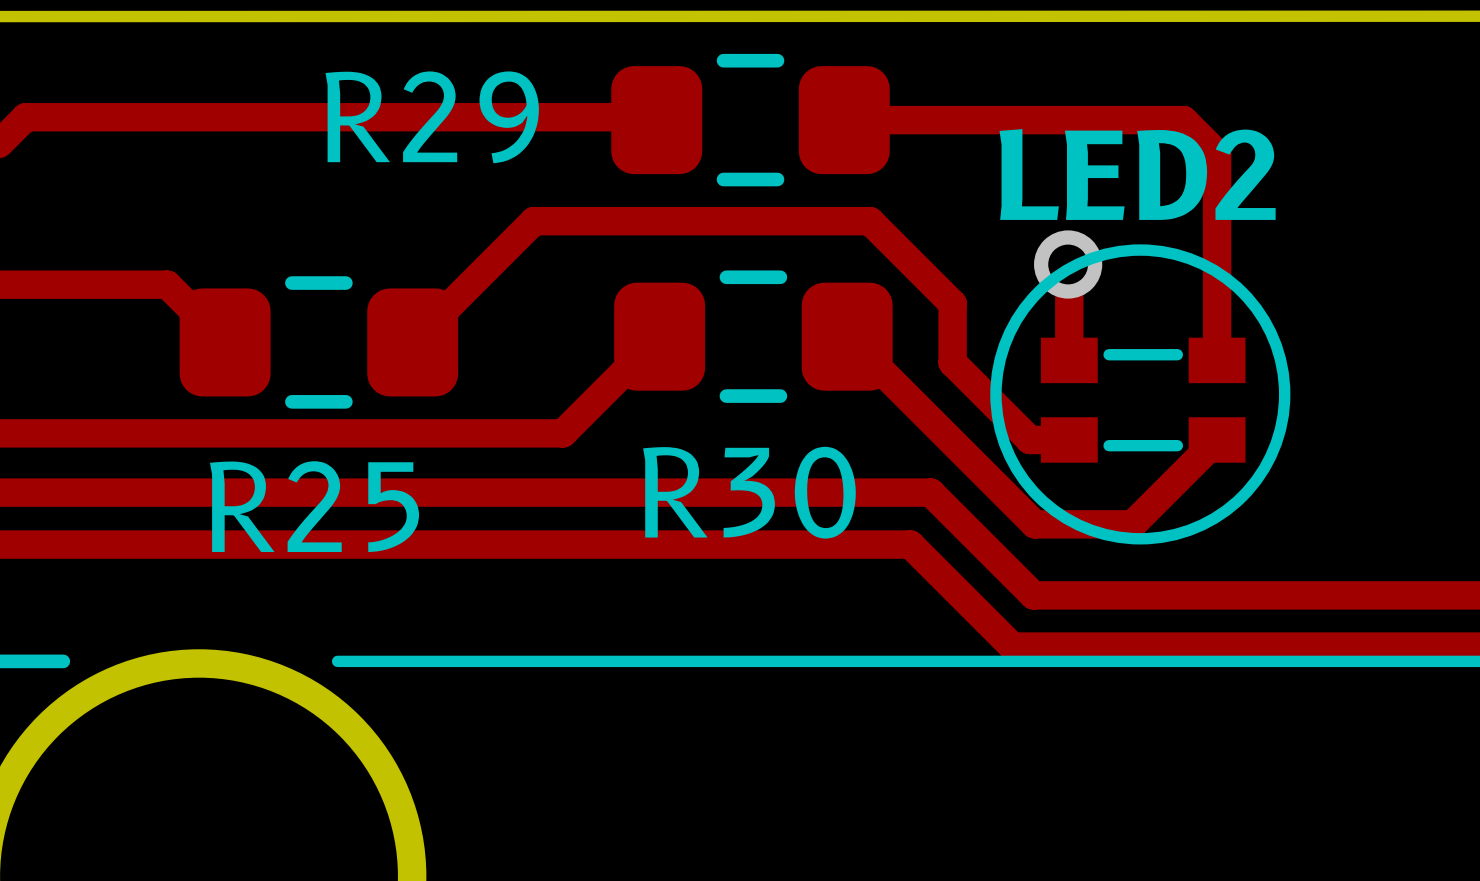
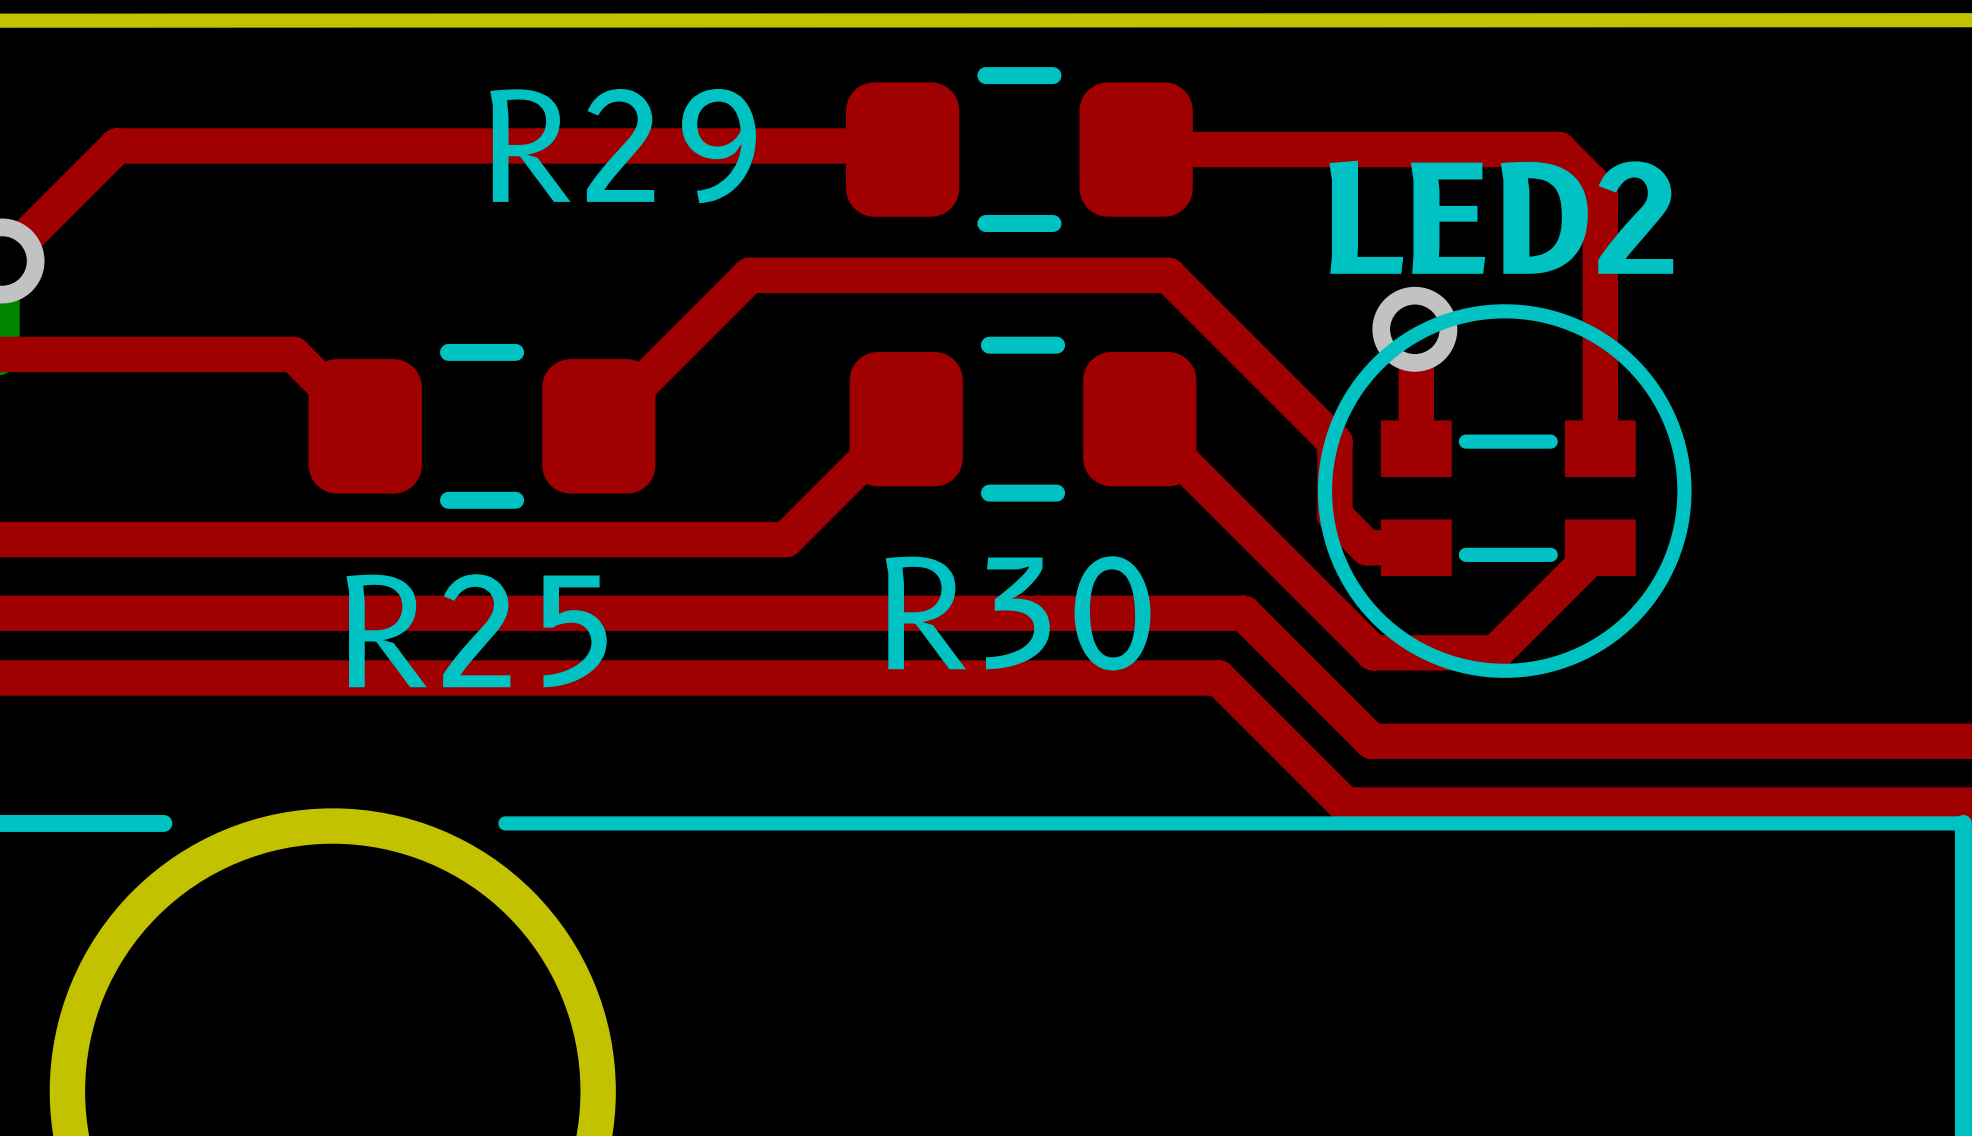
top track: (952, 303) (952, 362) (1003, 413) -> (1271, 378) (1334, 442) (1334, 515)

